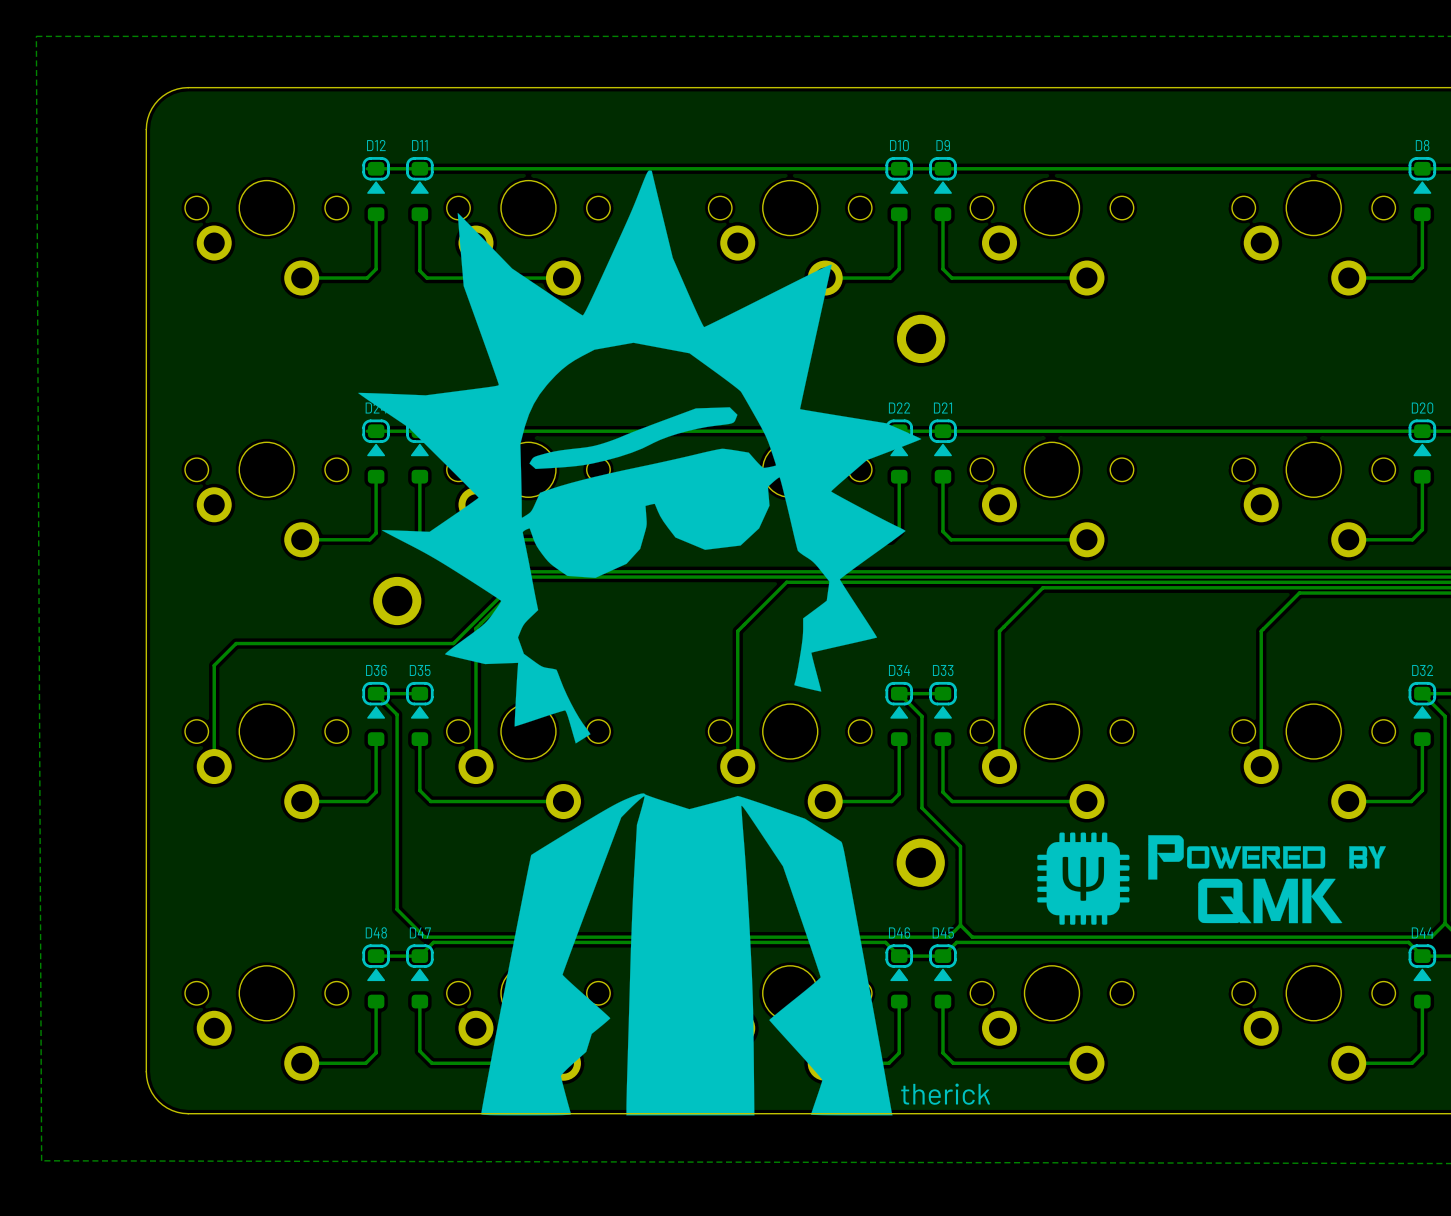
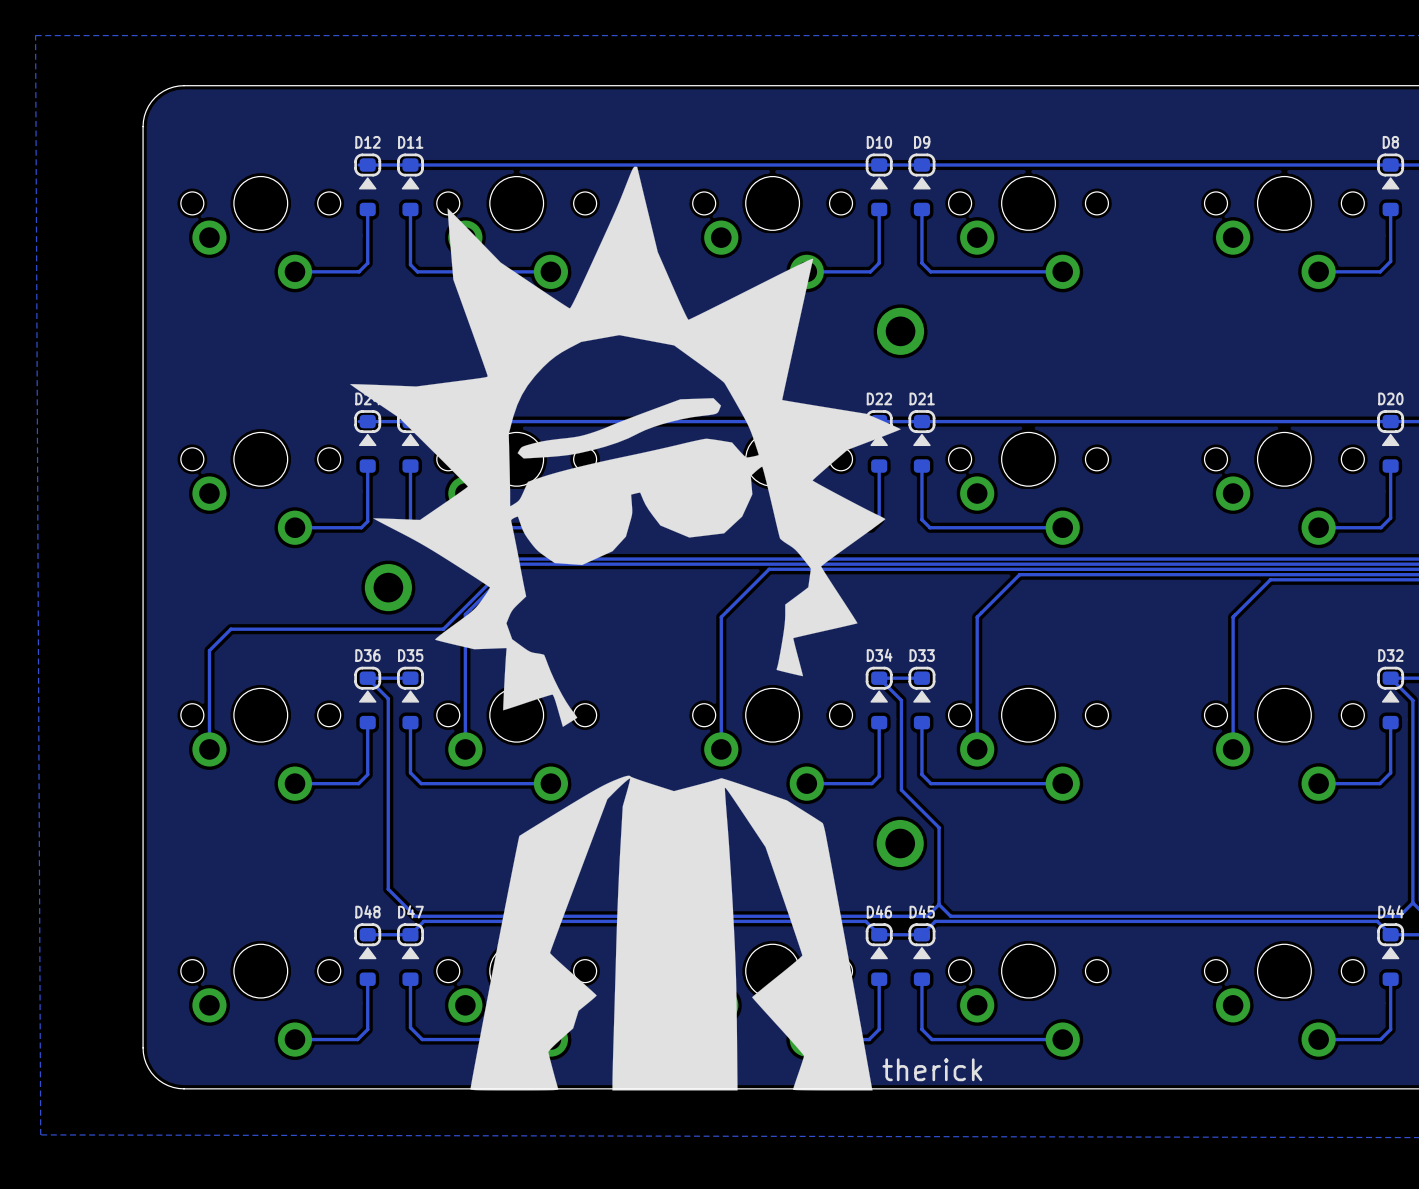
drawing: [1037, 832, 1386, 925] -> none

